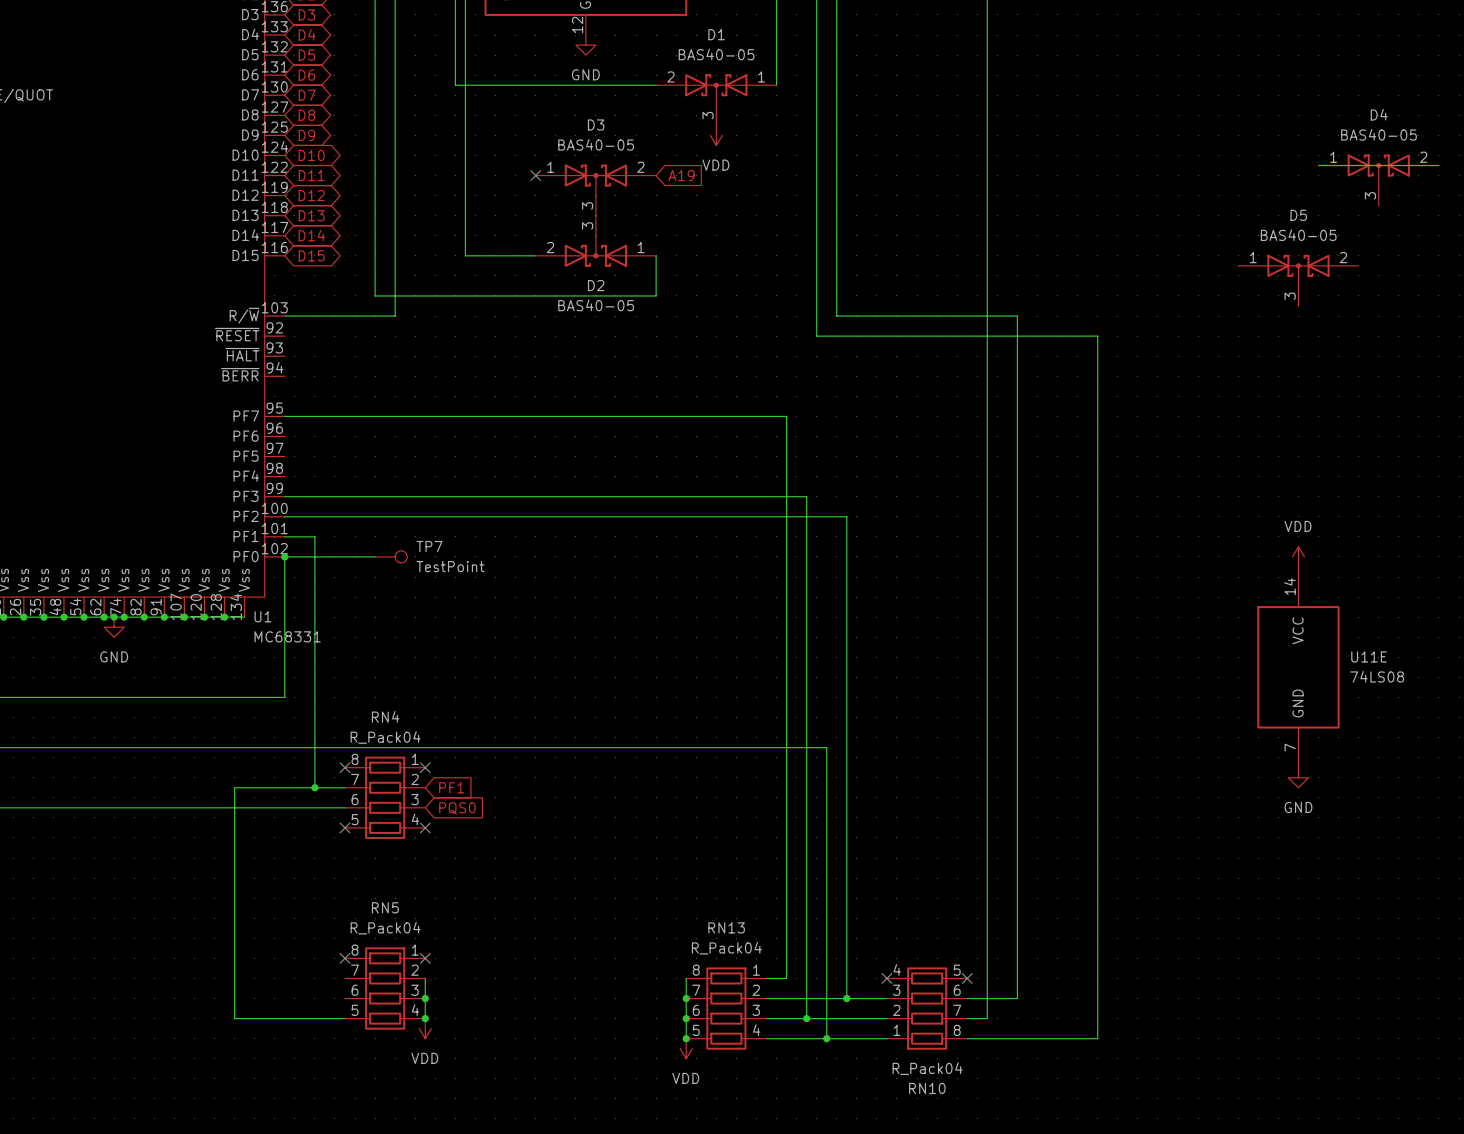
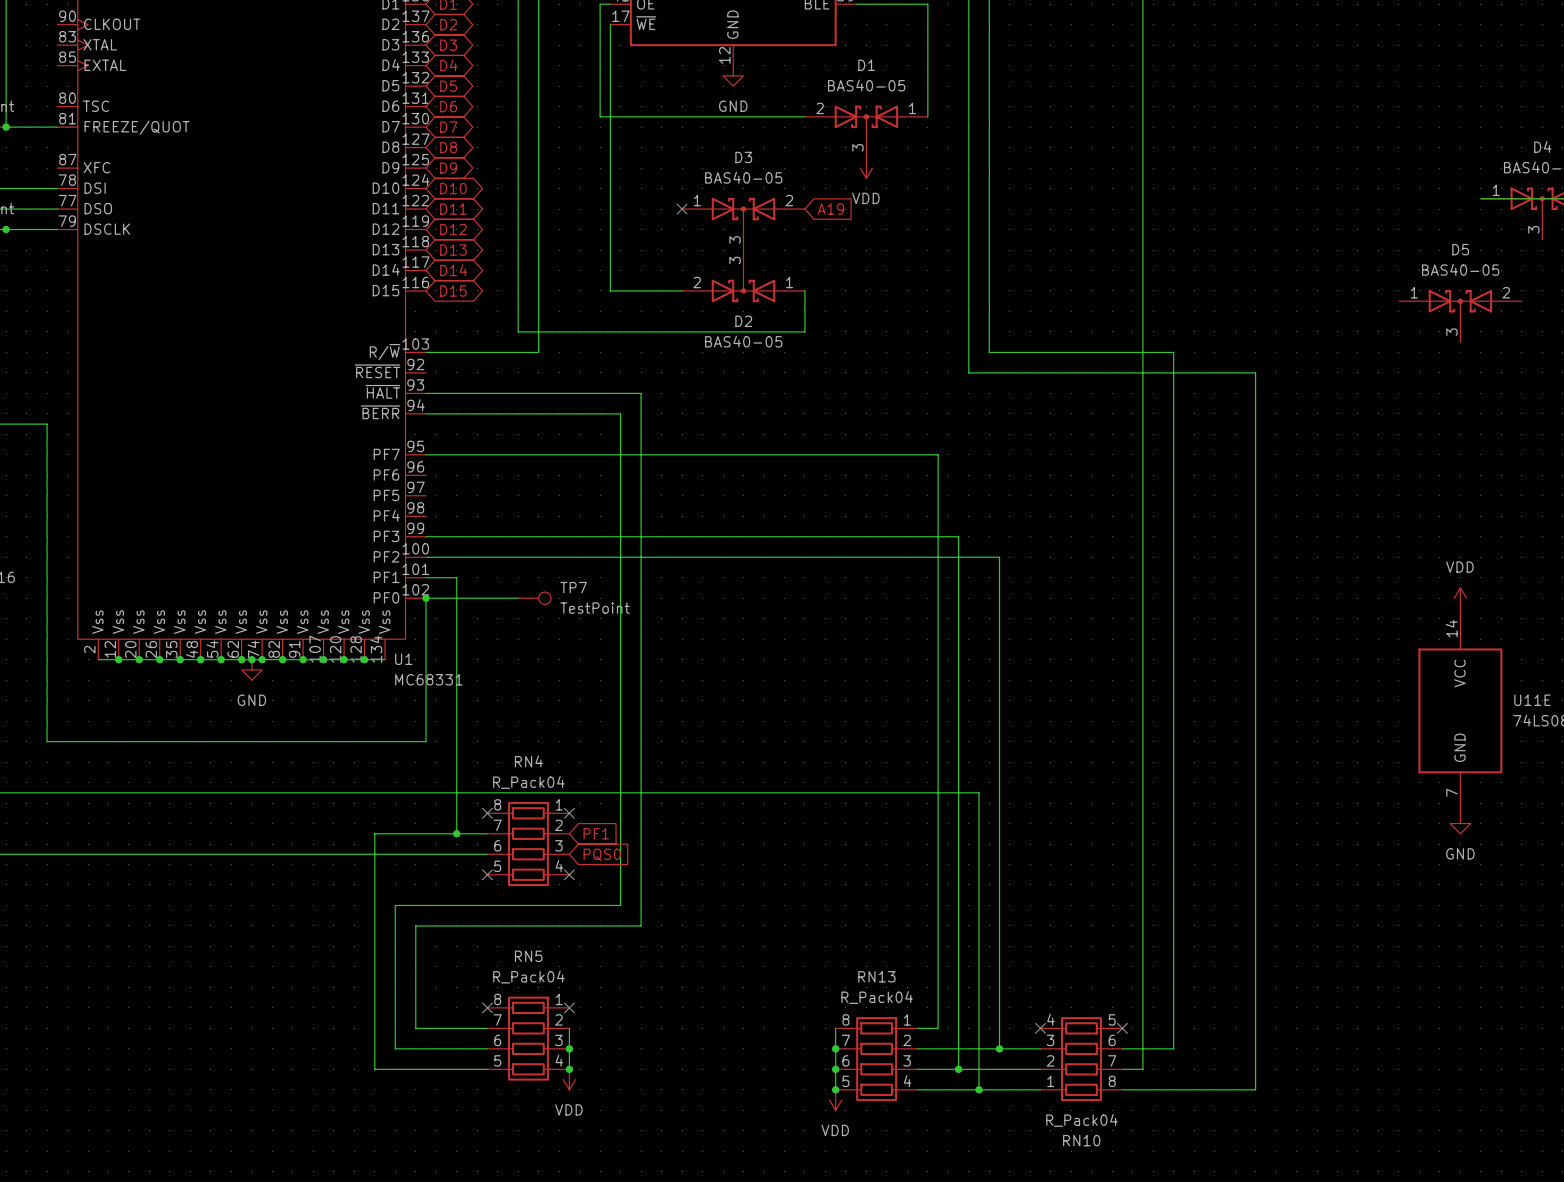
wire: none -> (426, 393) (641, 393) (641, 925) (415, 925) (415, 1028) (487, 1028)
wire: none -> (426, 413) (620, 413) (620, 905) (395, 905) (395, 1048) (487, 1048)

